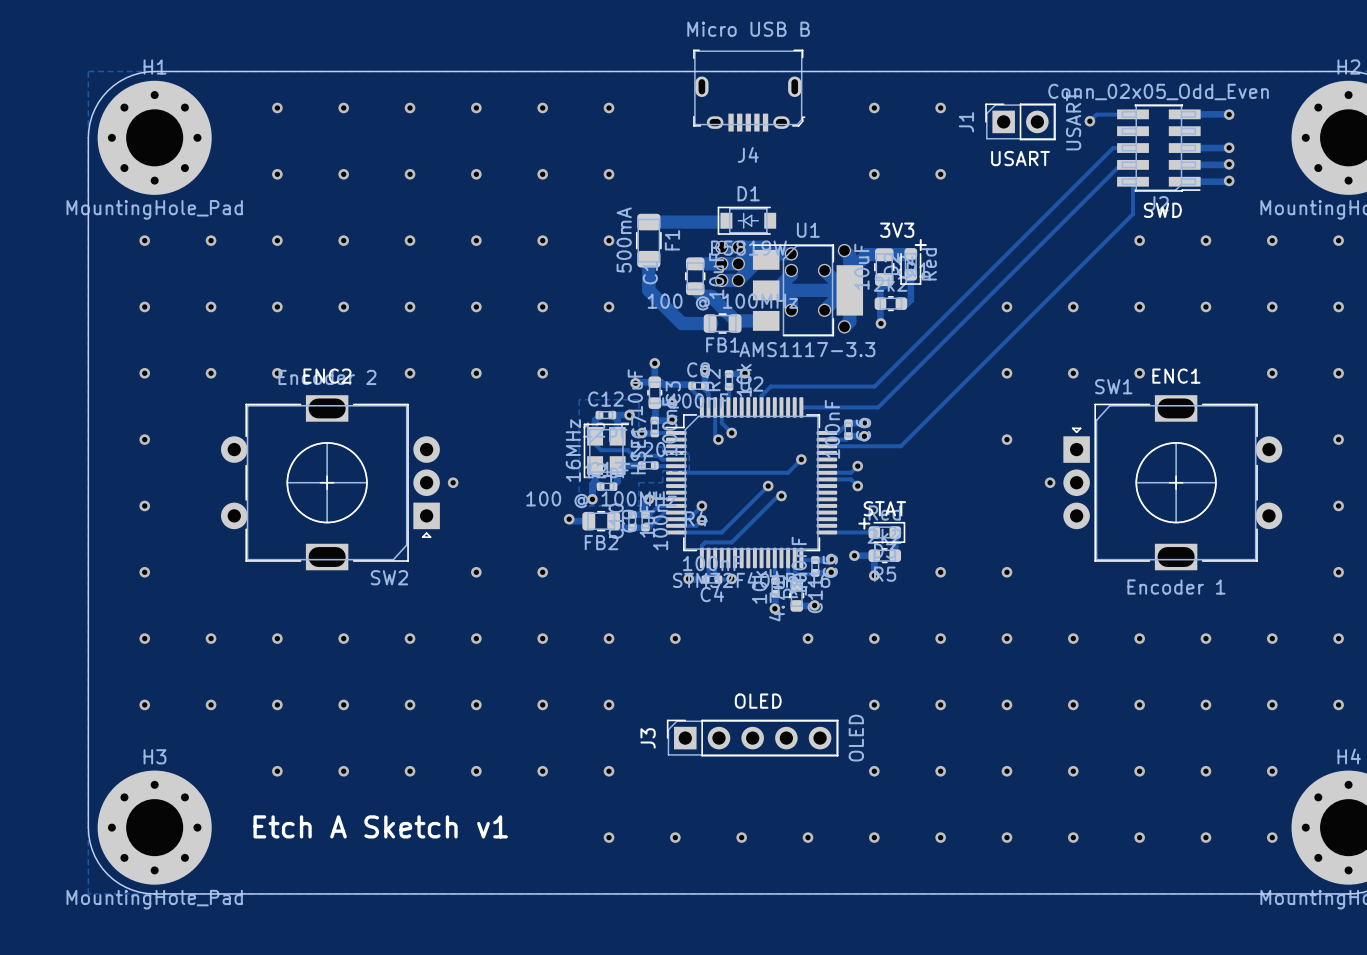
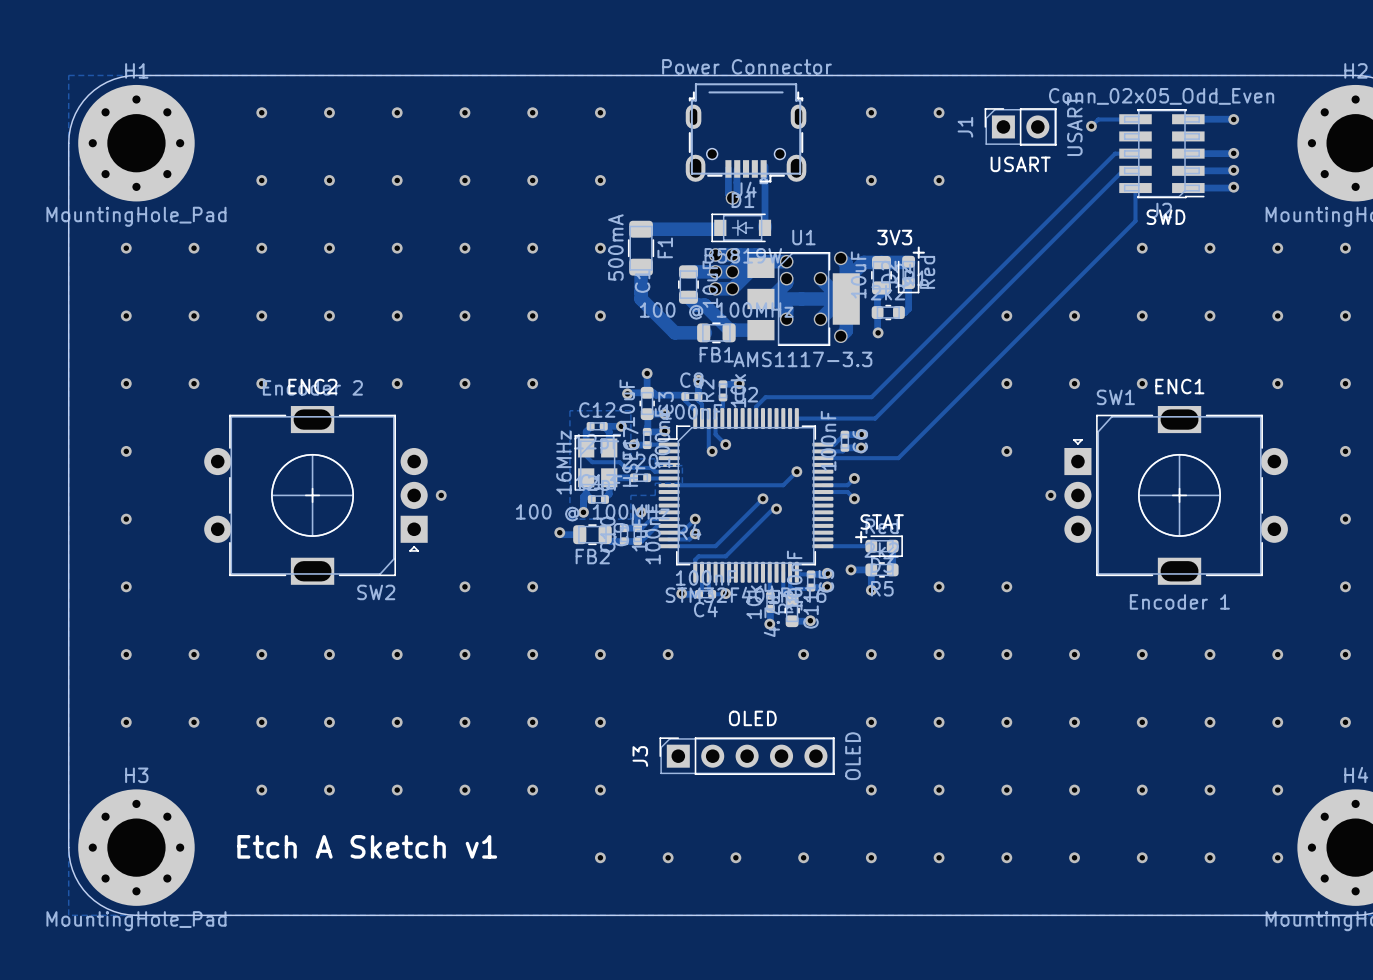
J4 value: Micro USB B (748, 29) -> Power Connector (747, 66)
J4 footprint: [693, 49, 806, 132] -> [685, 83, 807, 185]
track: none -> (765, 166) (765, 227) (765, 225)
track: none -> (728, 168) (728, 194) (732, 198) (736, 194) (736, 169)
via: none -> (732, 198)

